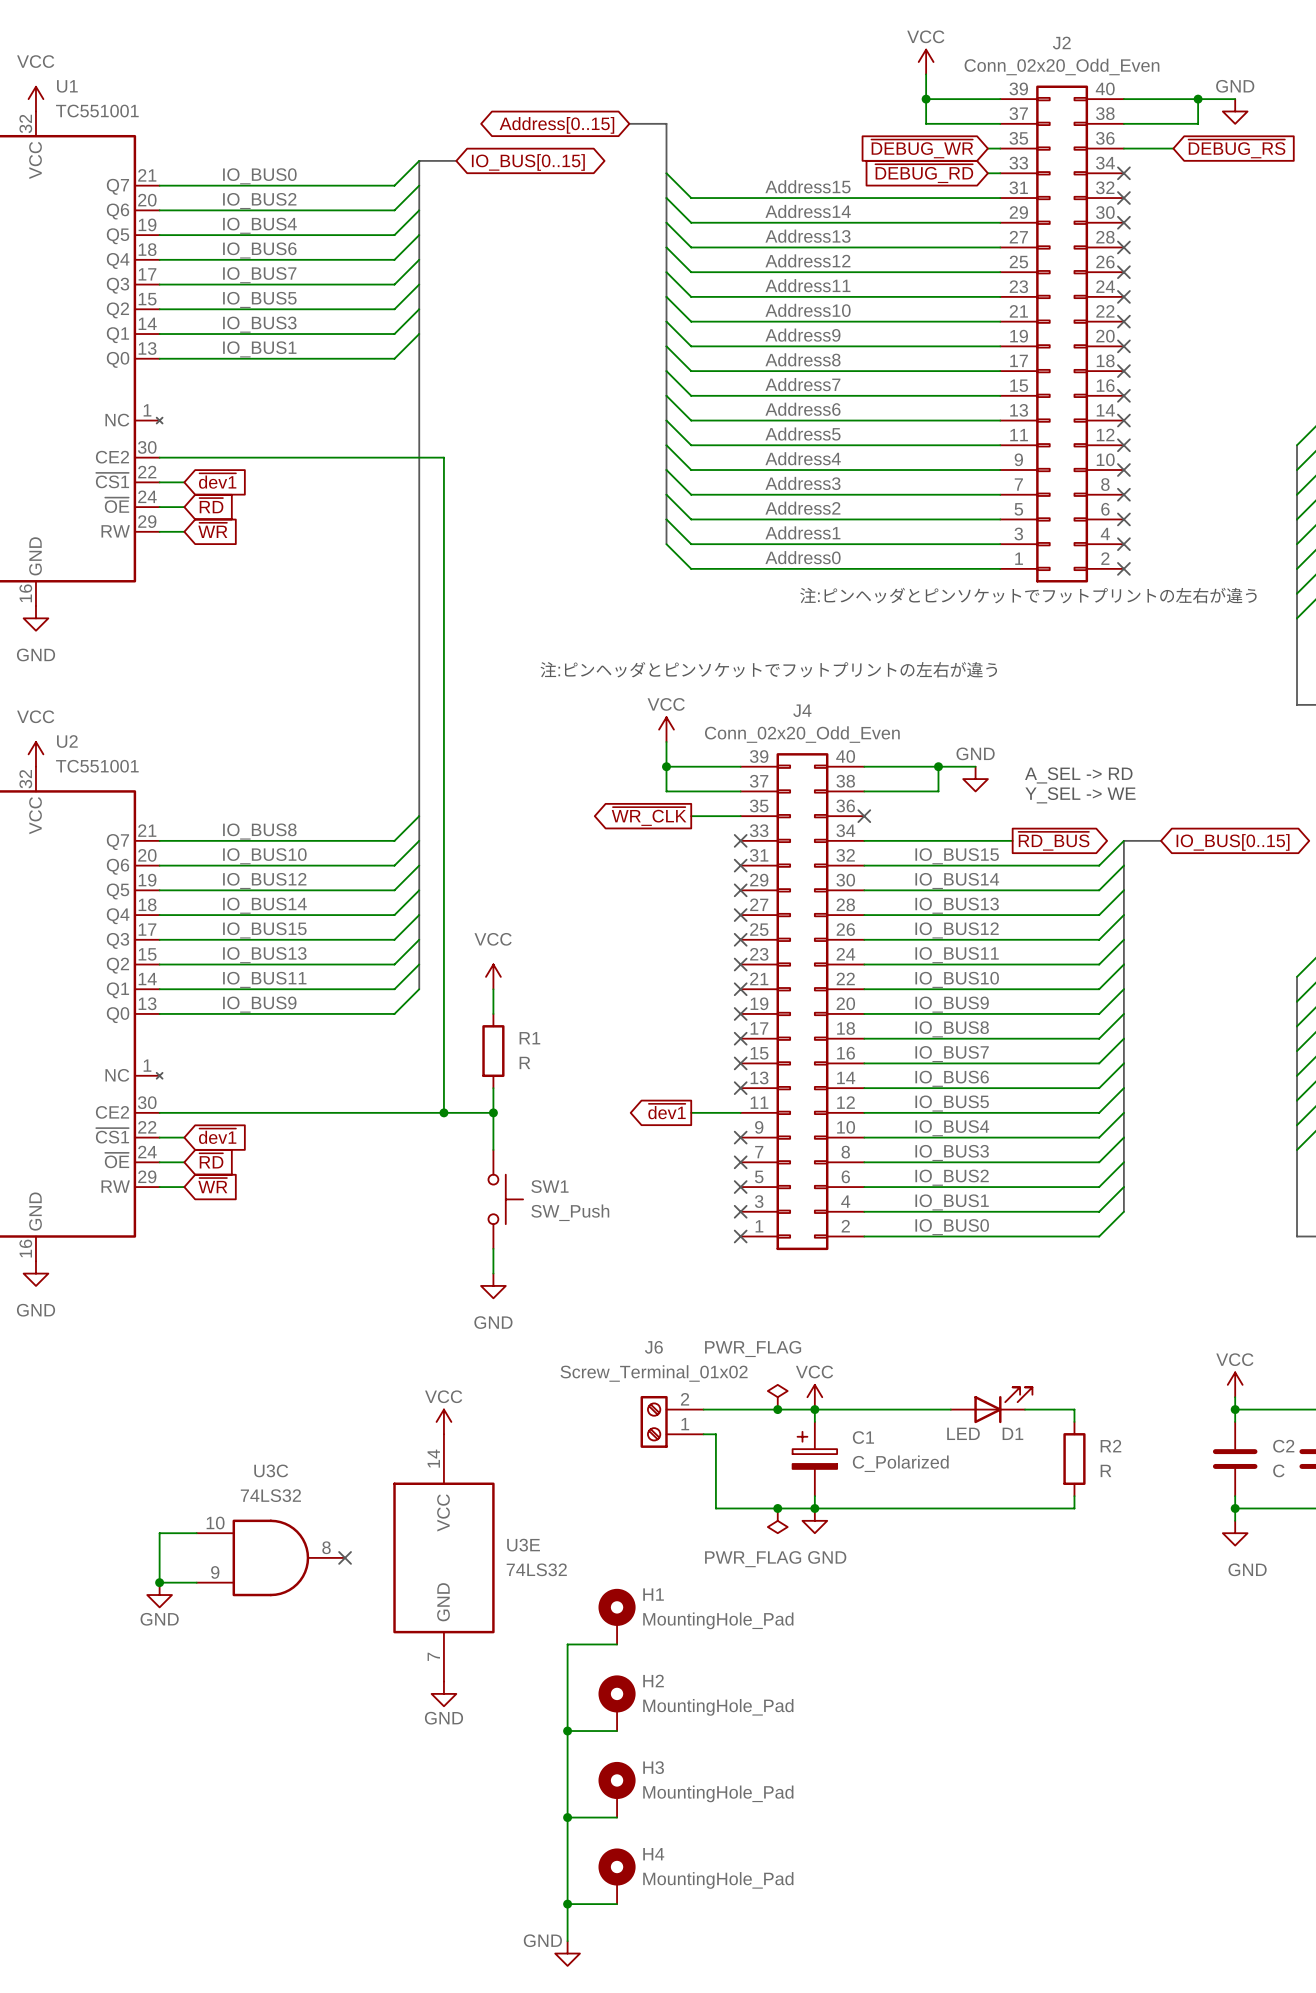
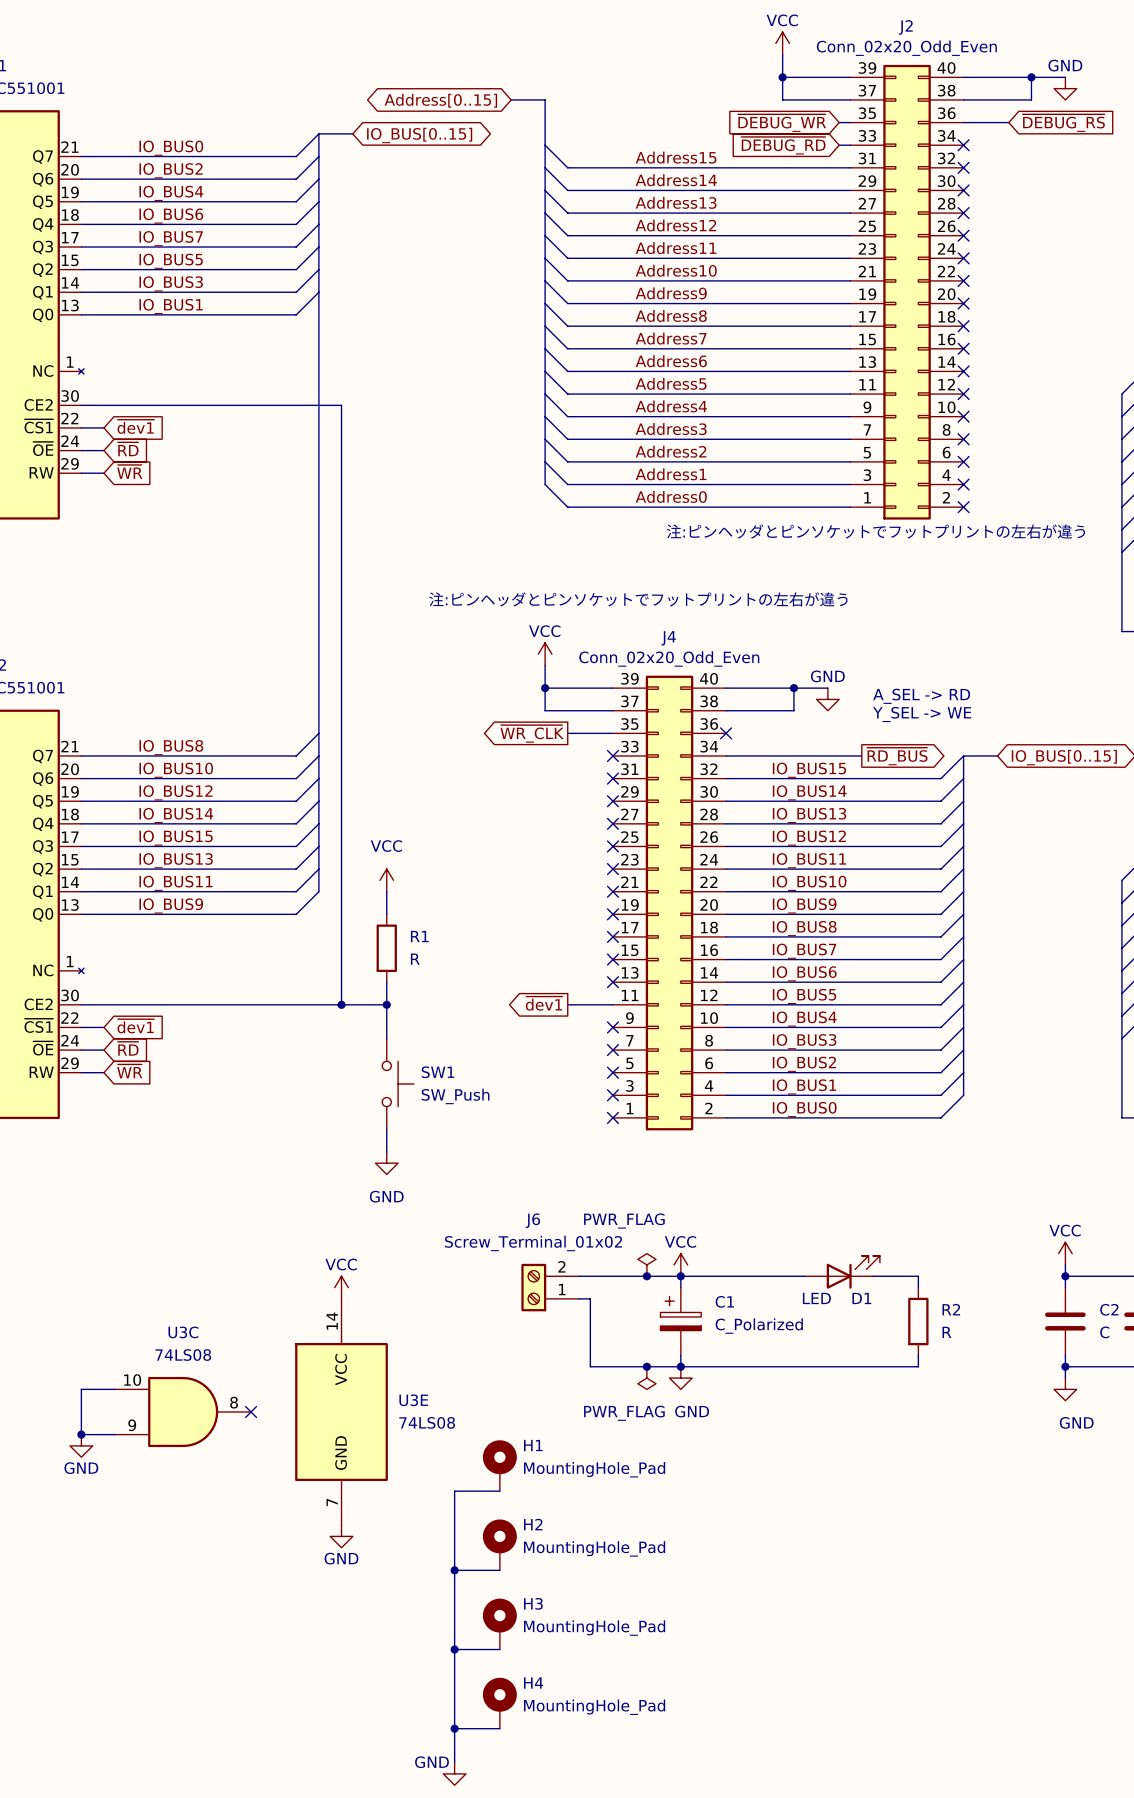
U3C value: 74LS32 (270, 1495) -> 74LS08 (183, 1355)
U3E value: 74LS32 (536, 1569) -> 74LS08 (427, 1422)

